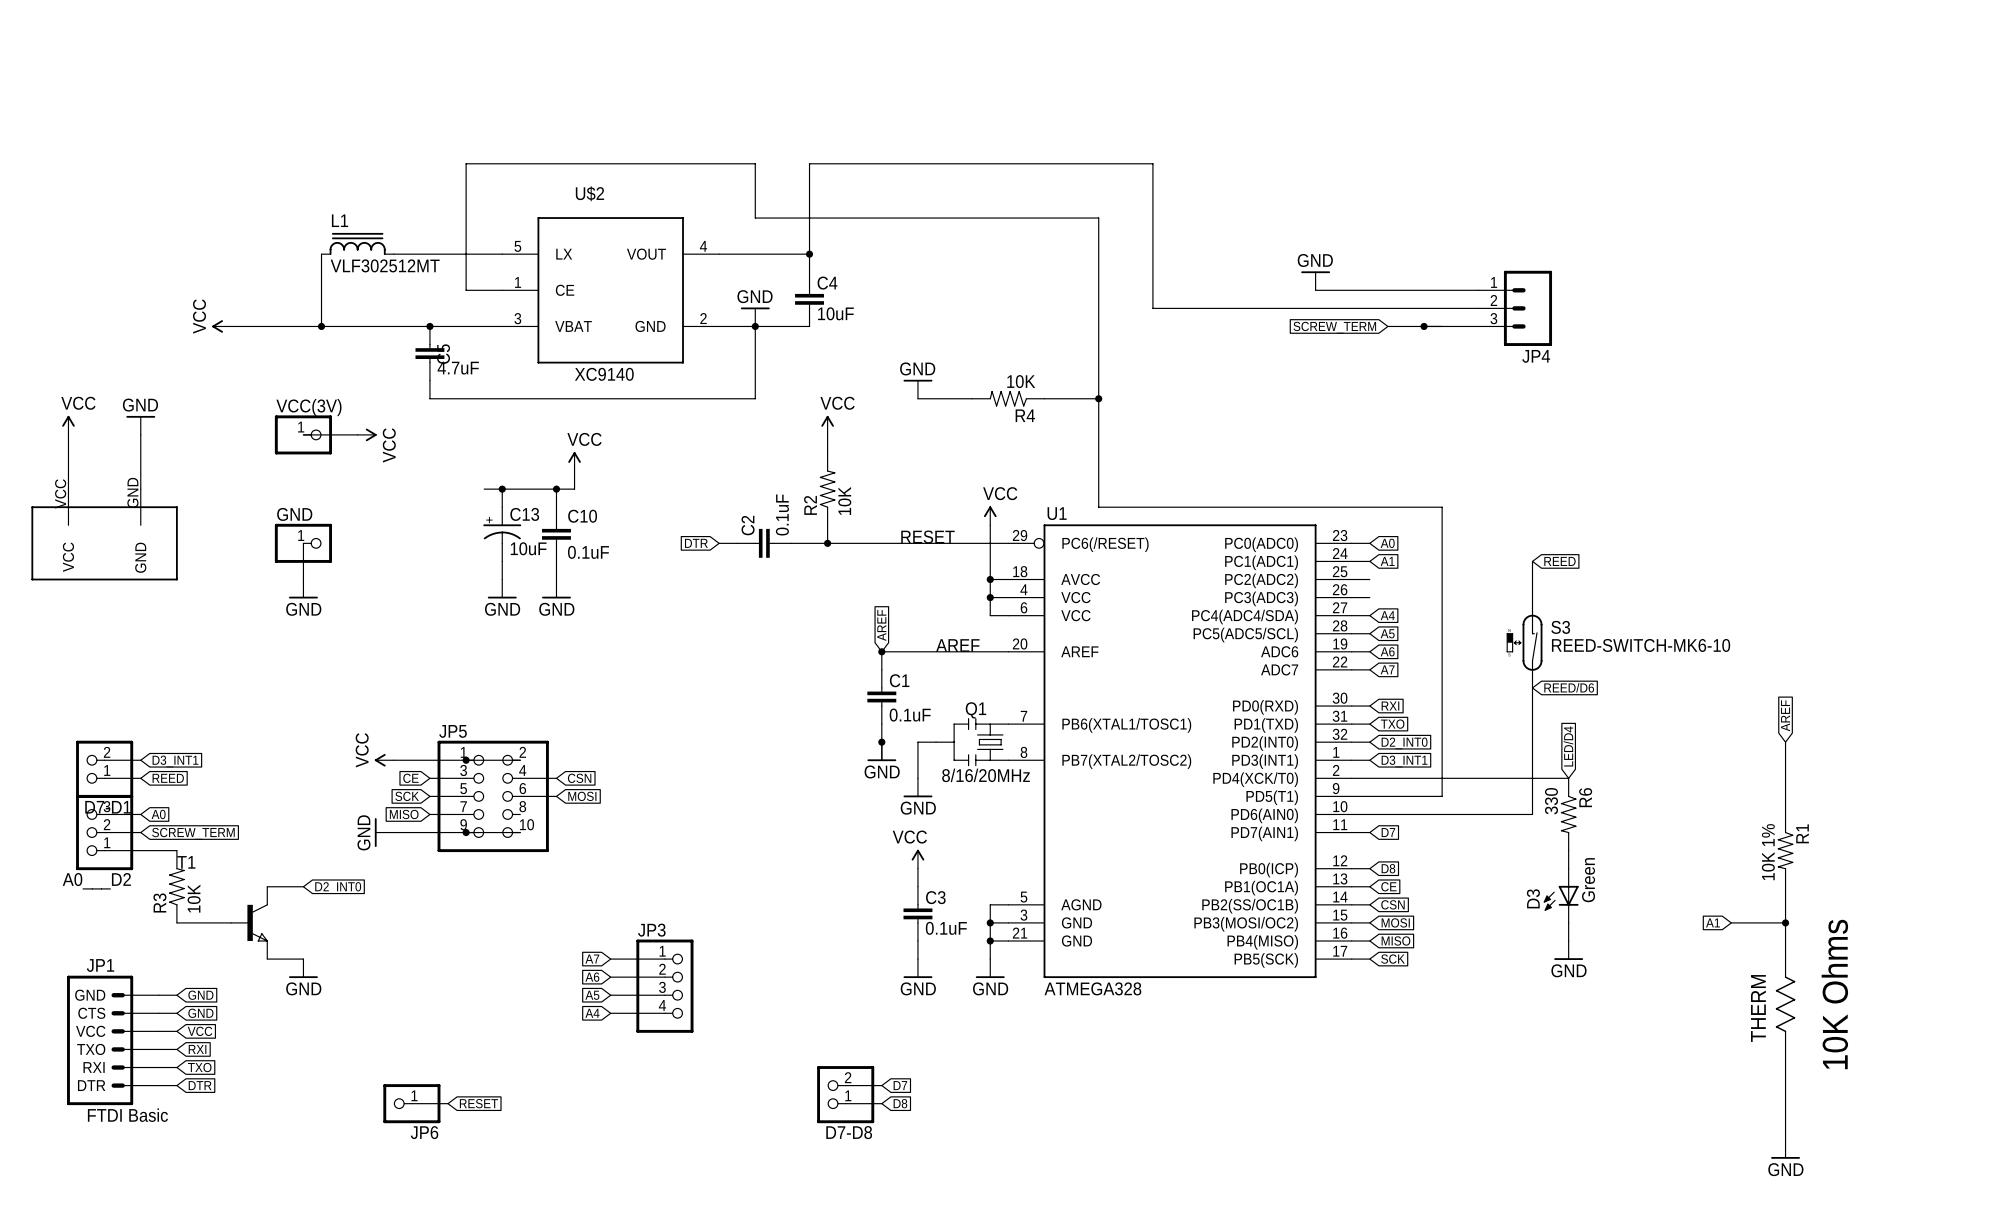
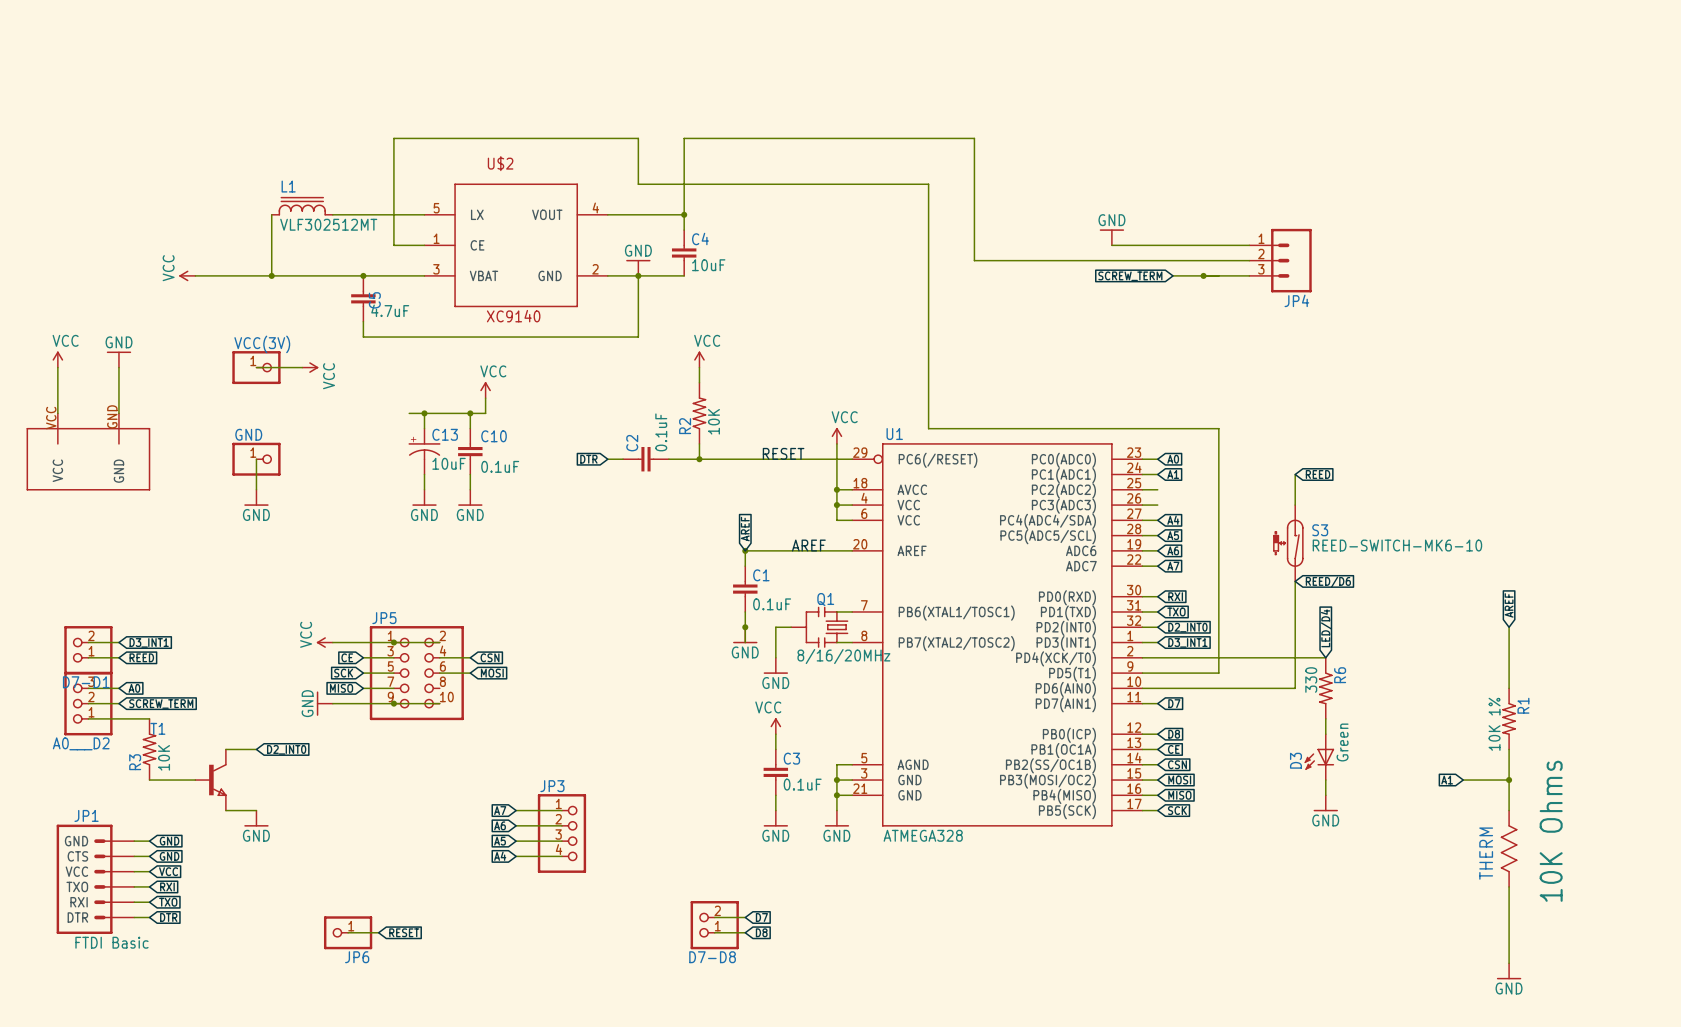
power symbol: GND (917, 389) -> none
wire: (917, 398) (972, 398) -> none
R4: 10K (1008, 398) -> none
wire: (1044, 398) (1098, 398) -> none
junction: (1098, 398) -> none

